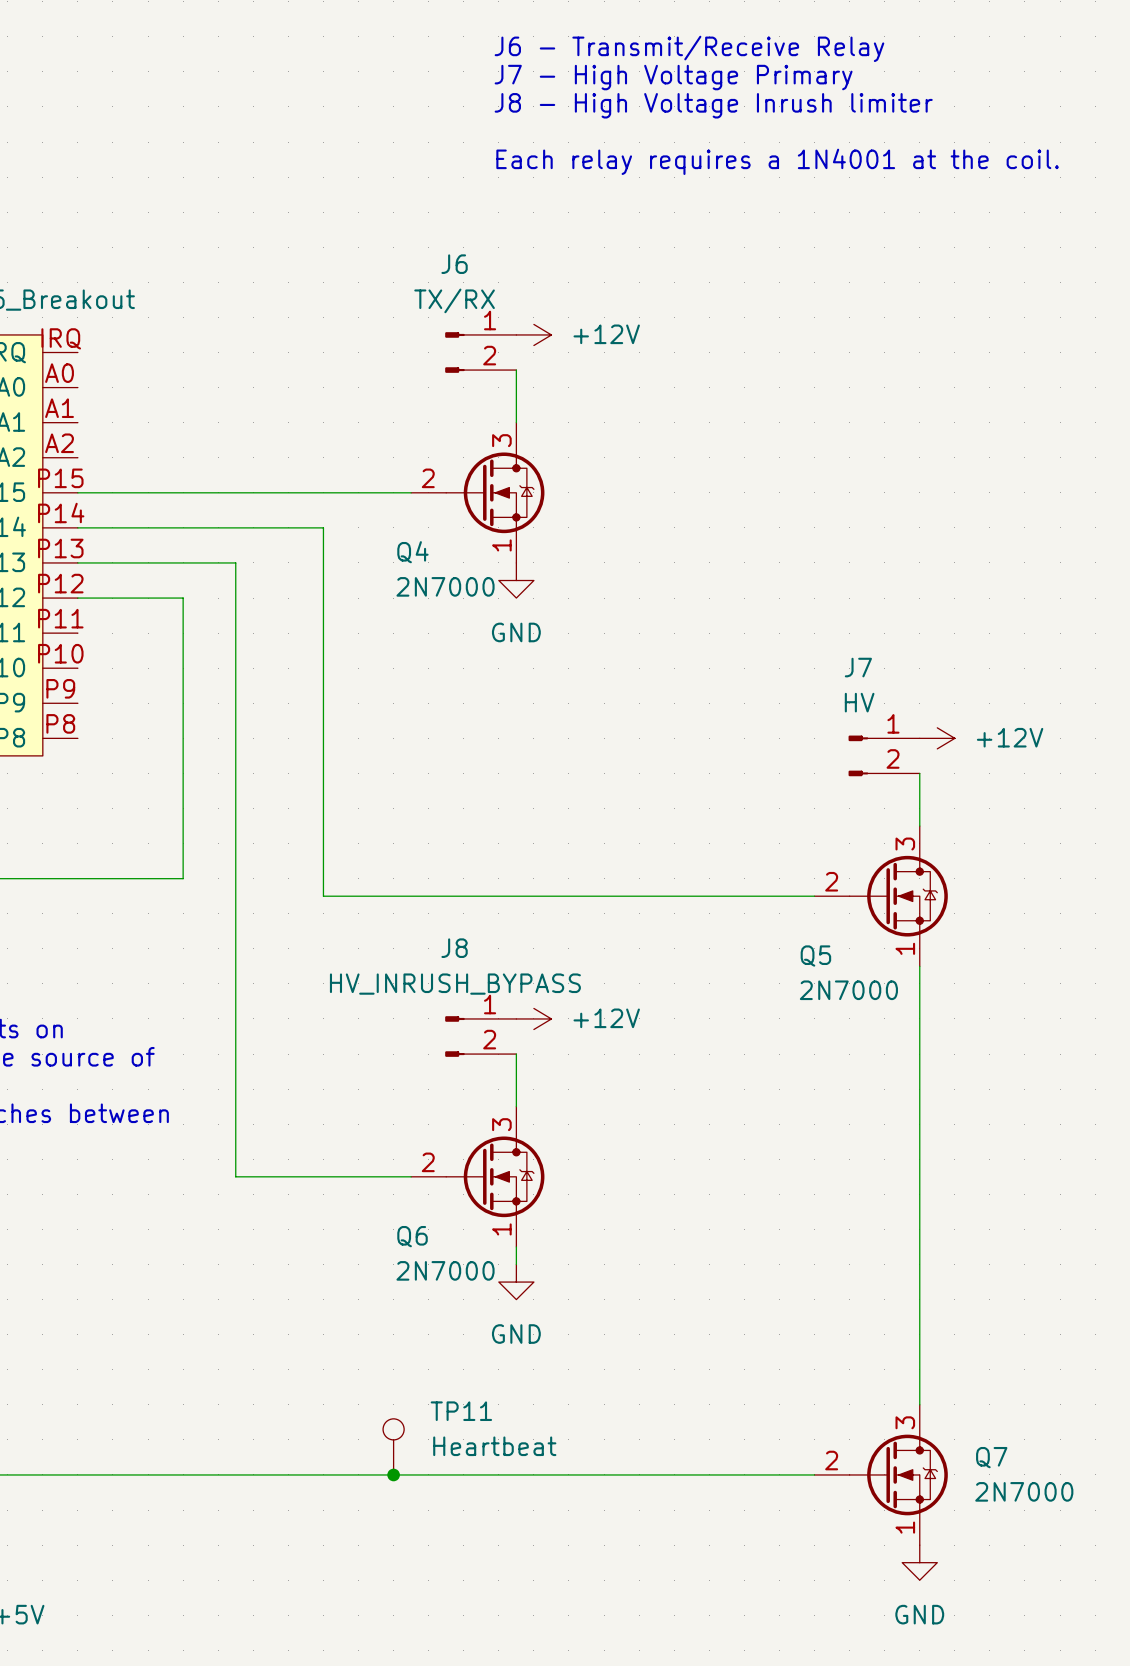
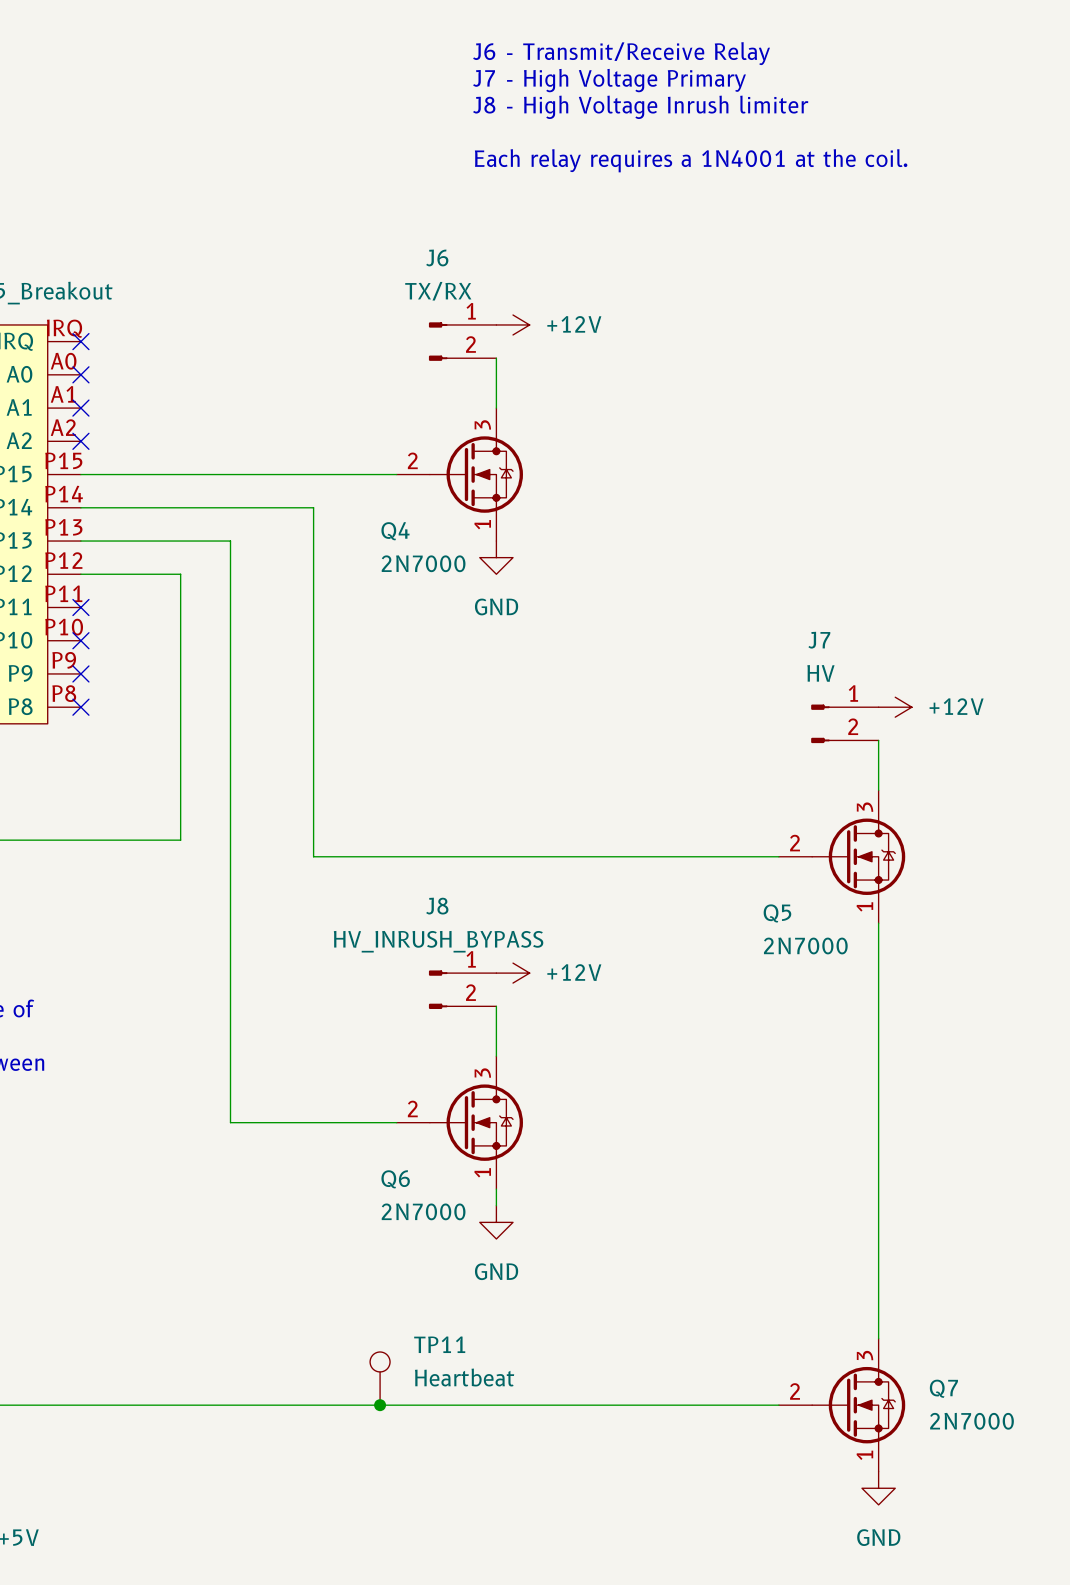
no-connect mark: none -> (80, 341)
no-connect mark: none -> (80, 374)
no-connect mark: none -> (80, 408)
no-connect mark: none -> (80, 441)
no-connect mark: none -> (80, 607)
no-connect mark: none -> (80, 640)
no-connect mark: none -> (80, 673)
no-connect mark: none -> (80, 707)

